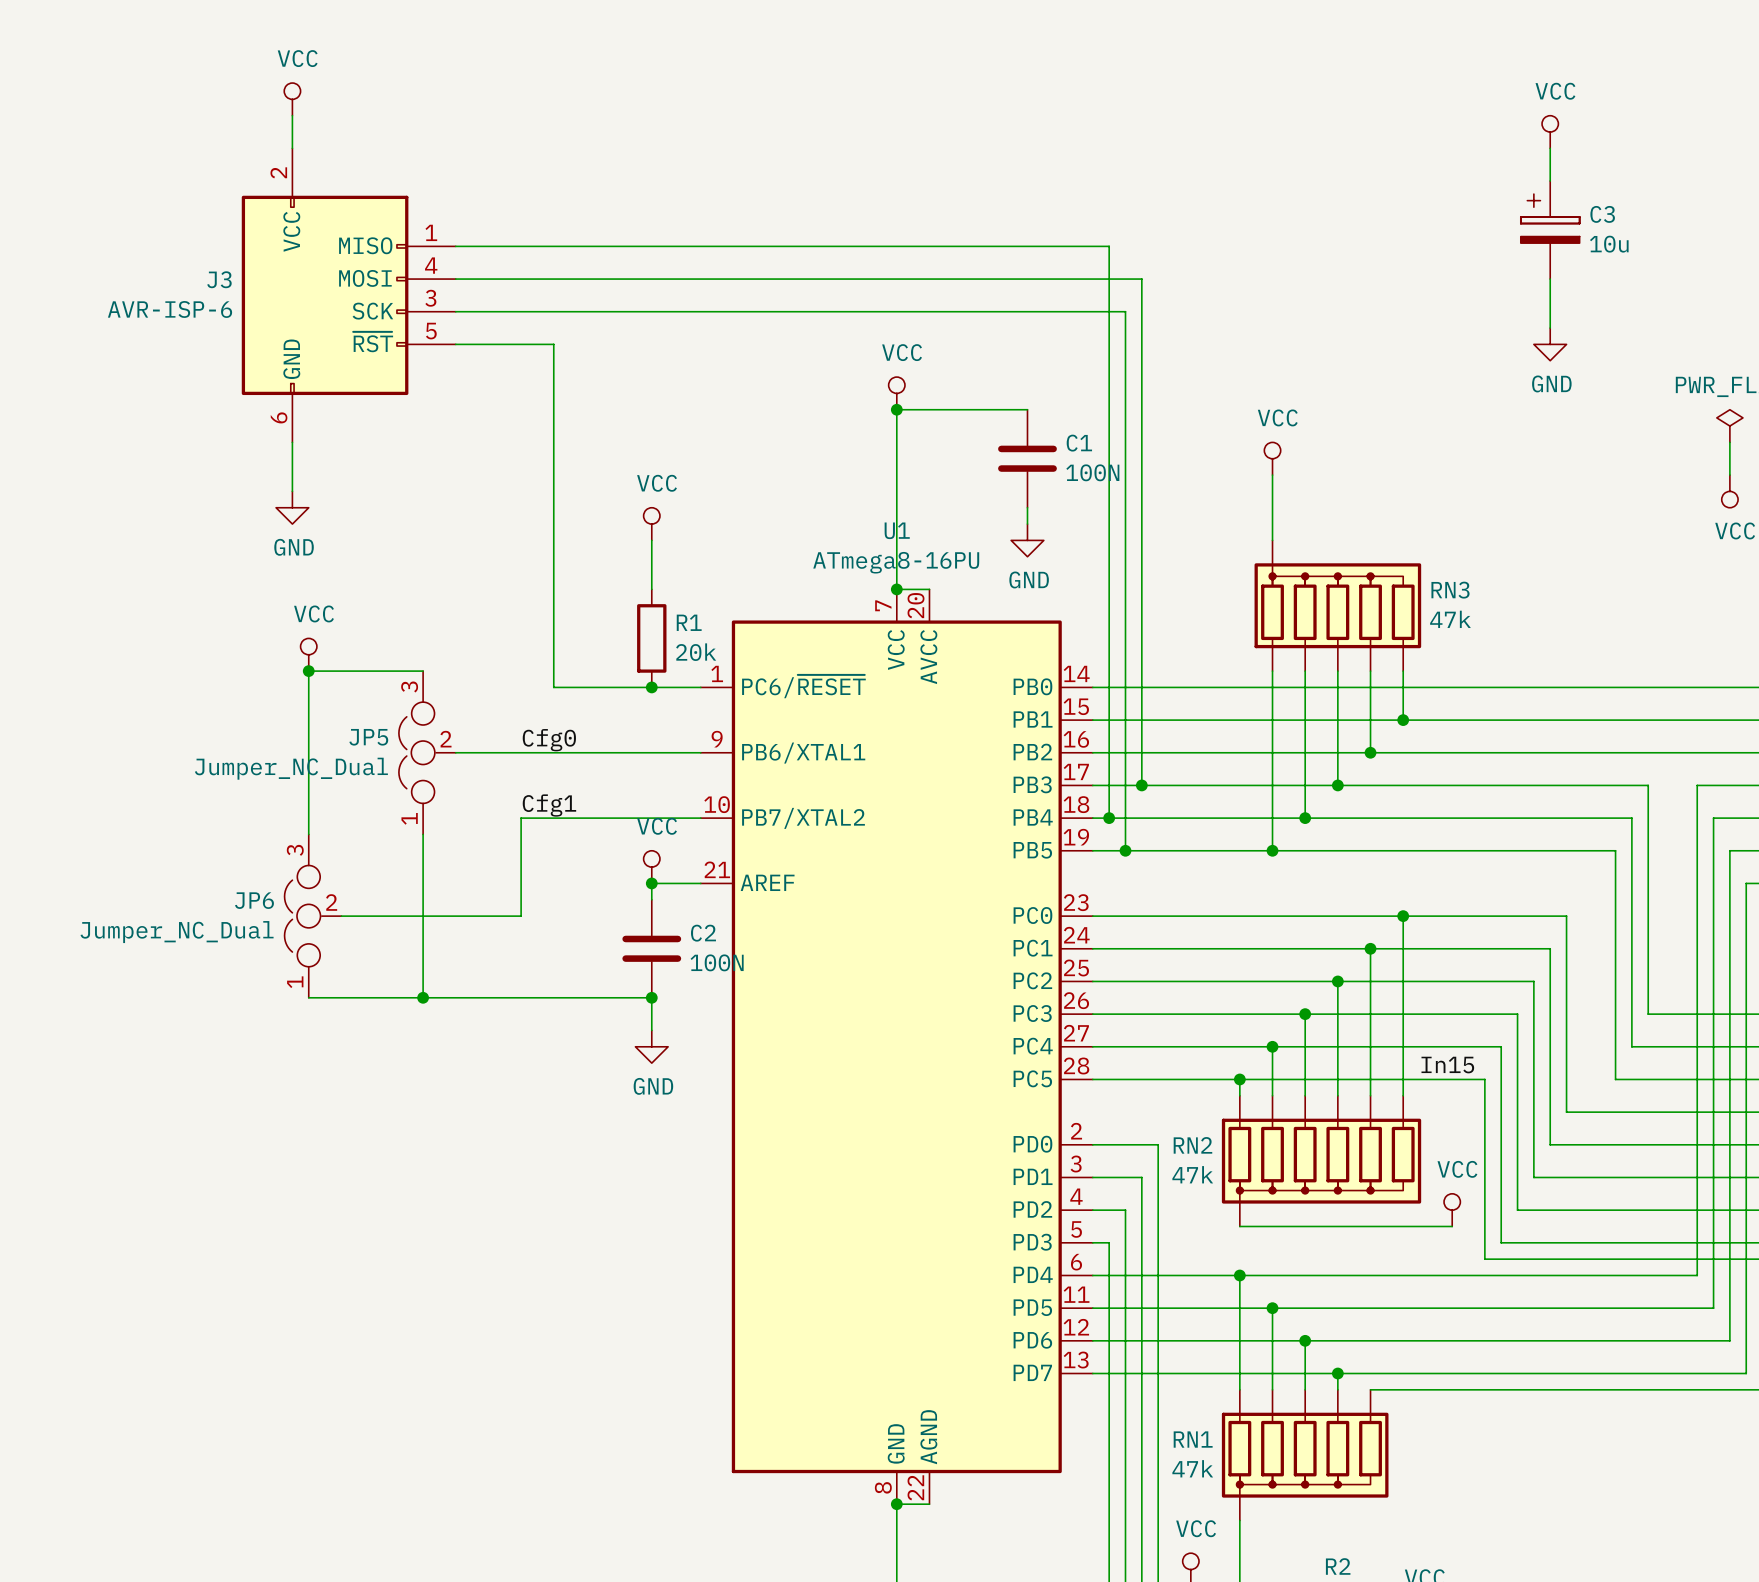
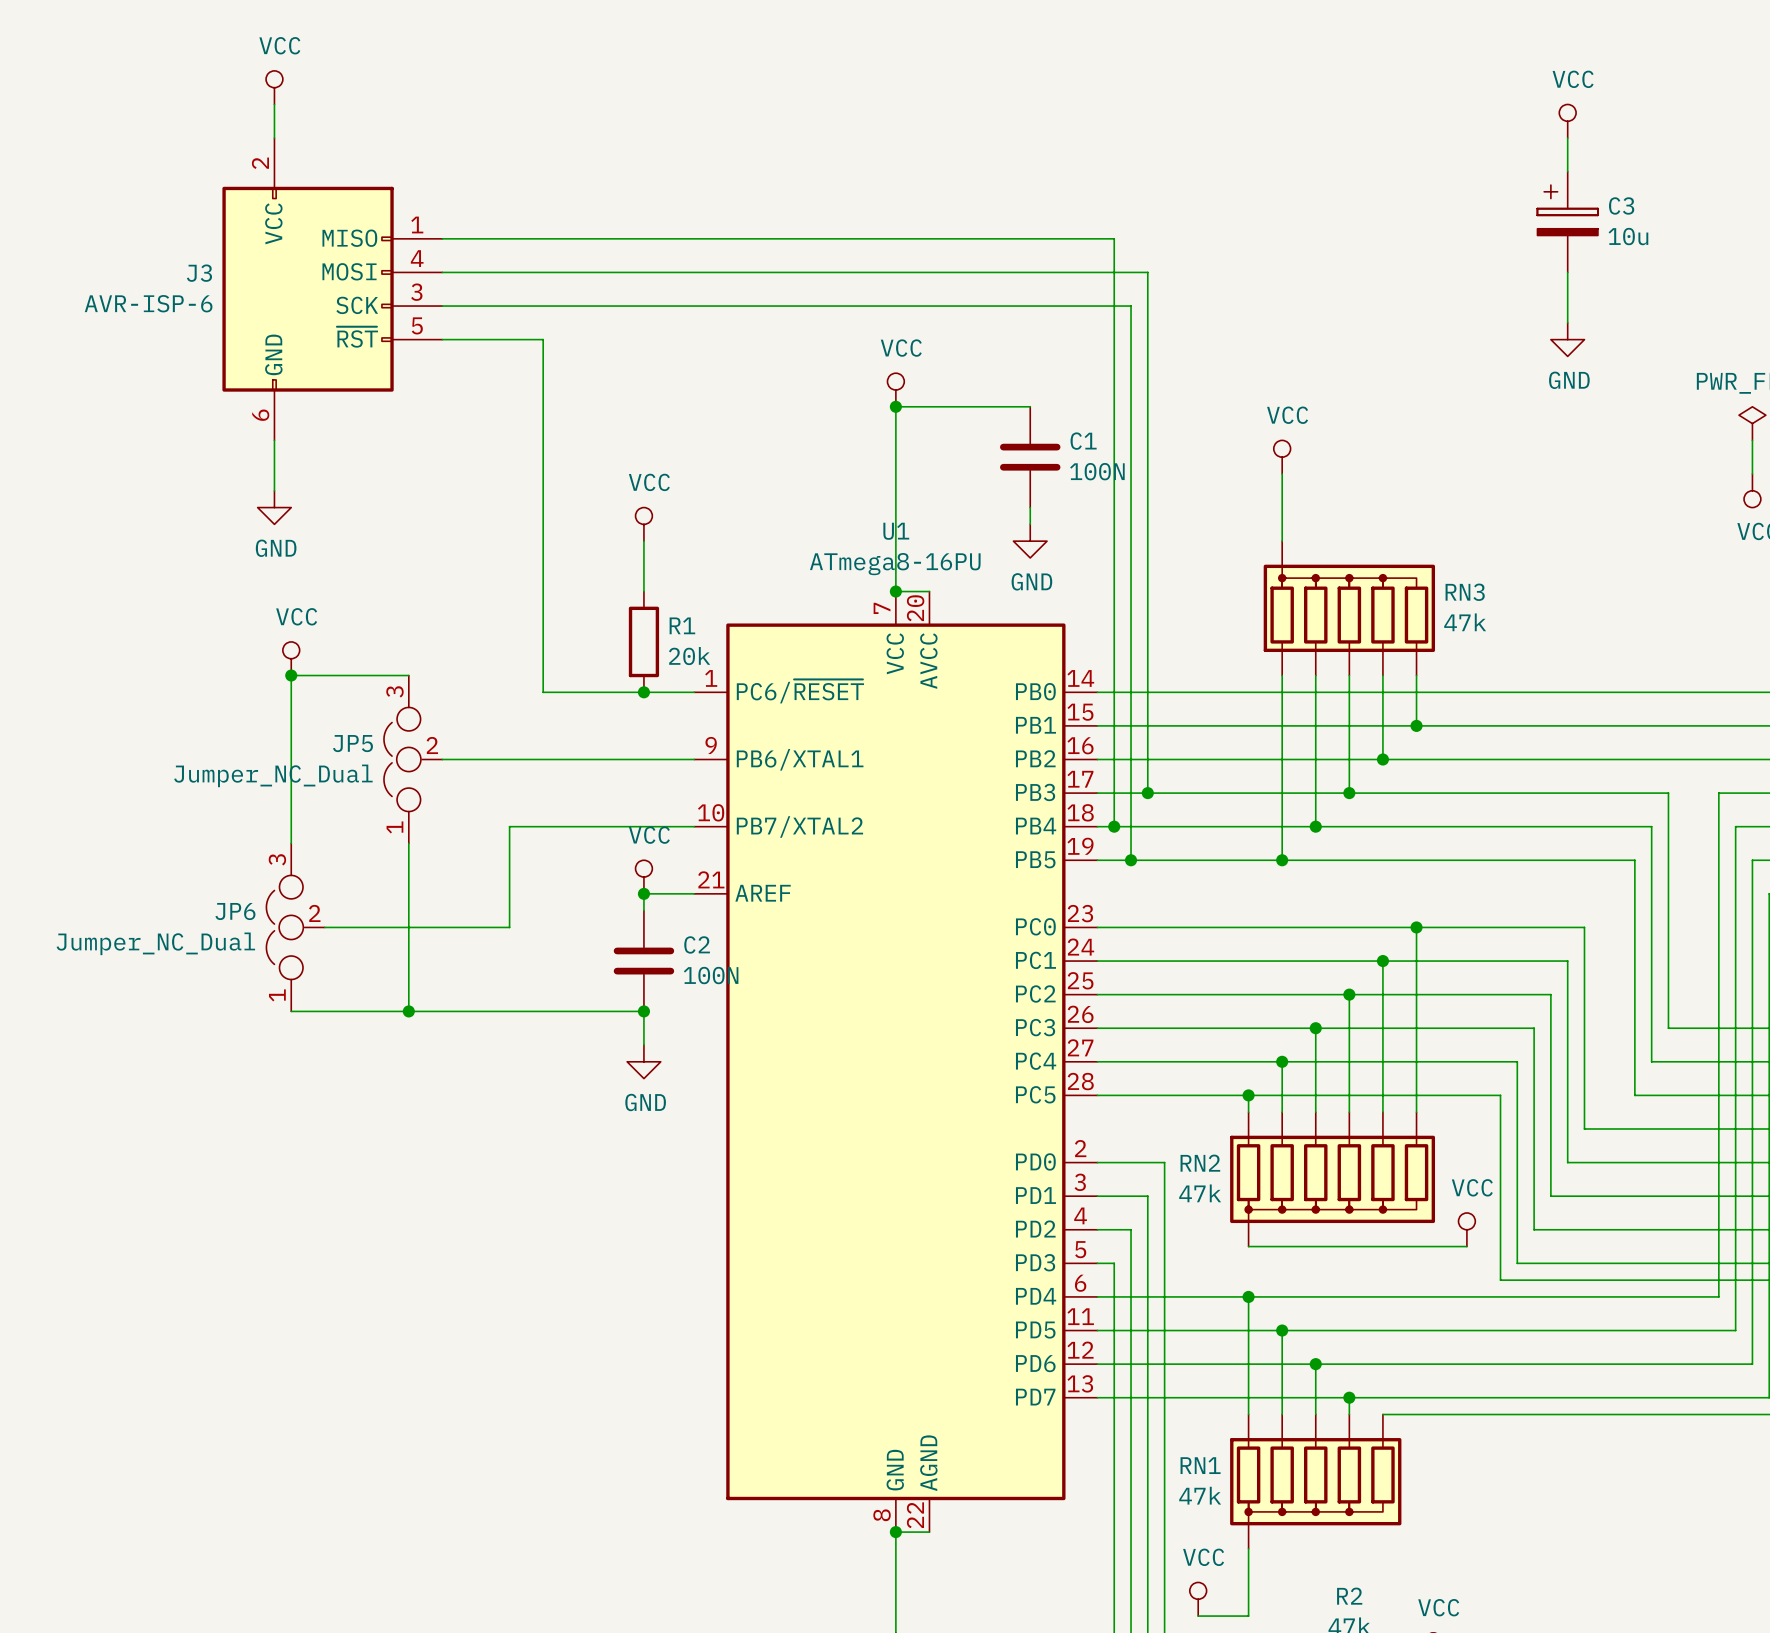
label: Cfg0 (549, 740) -> none
label: Cfg1 (549, 805) -> none
label: In15 (1447, 1065) -> none

